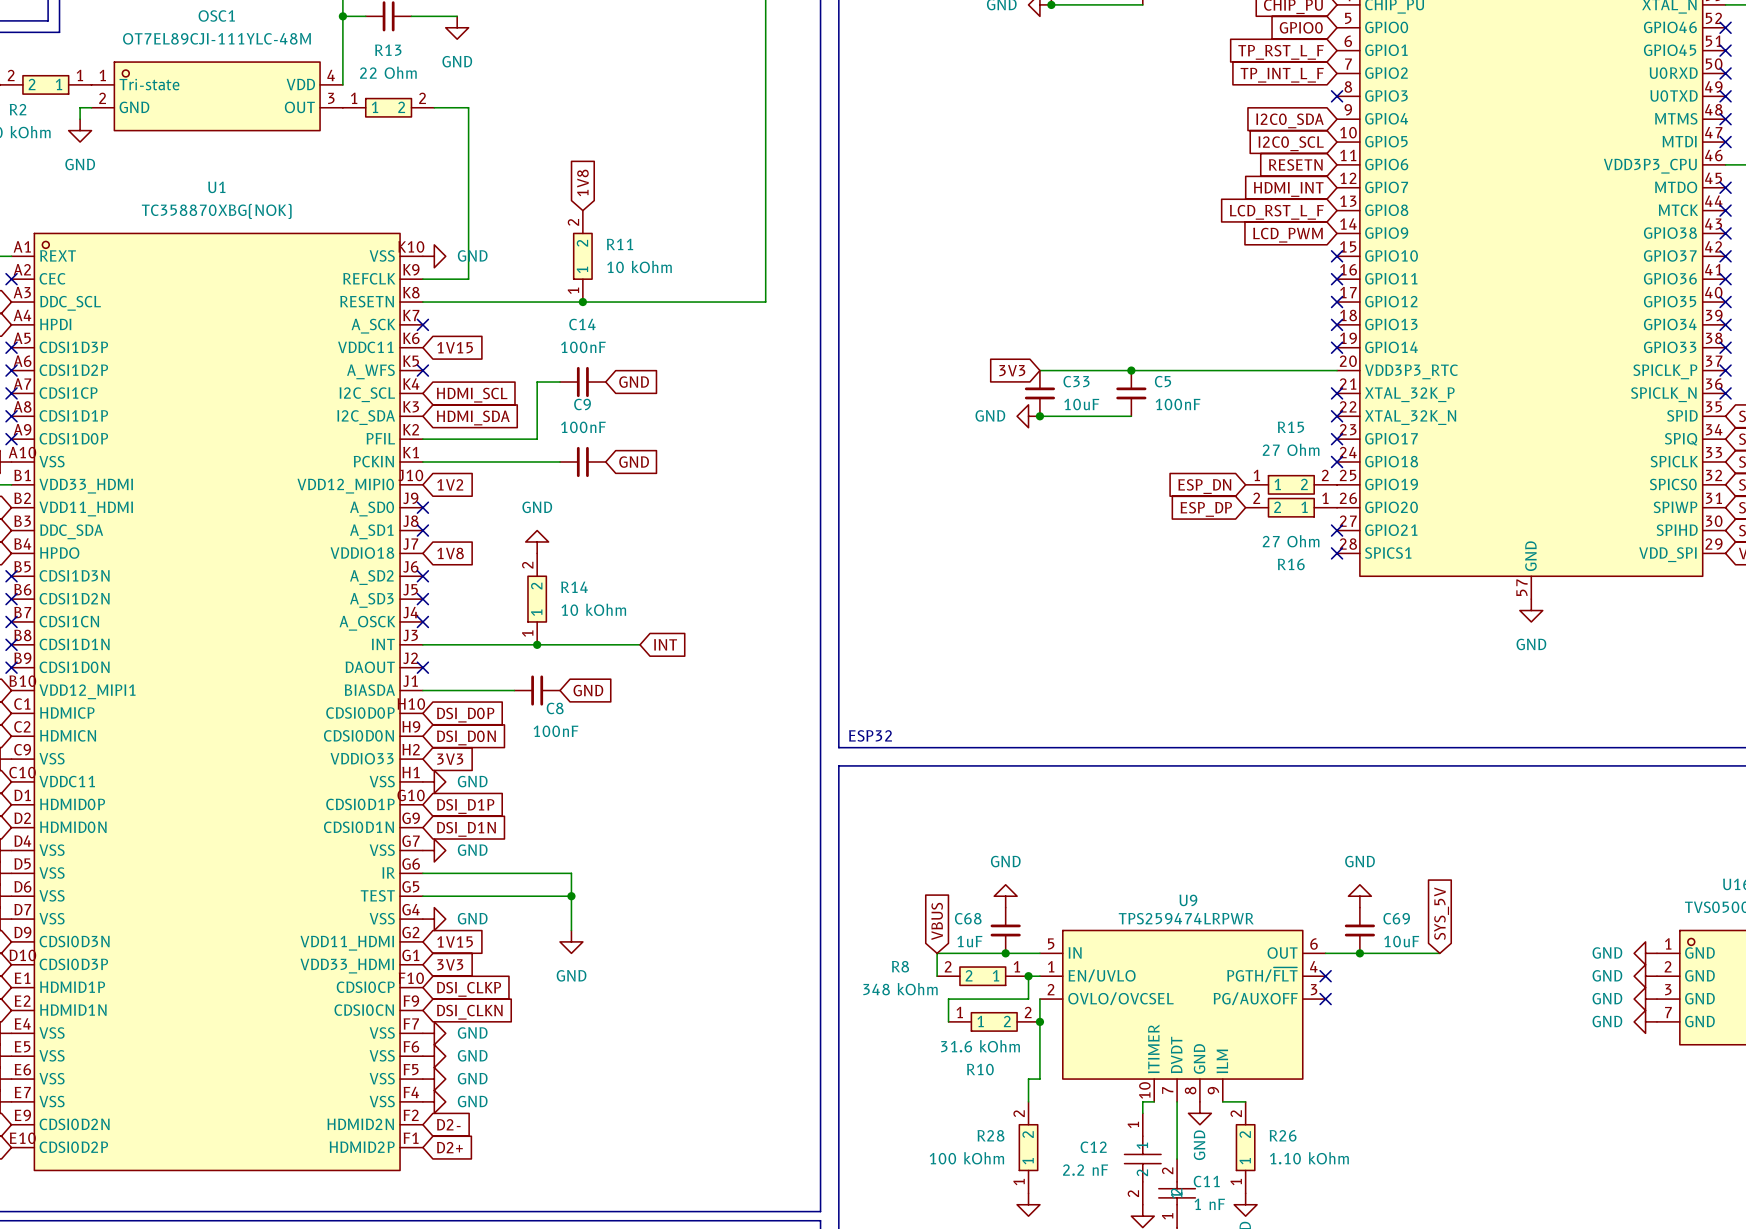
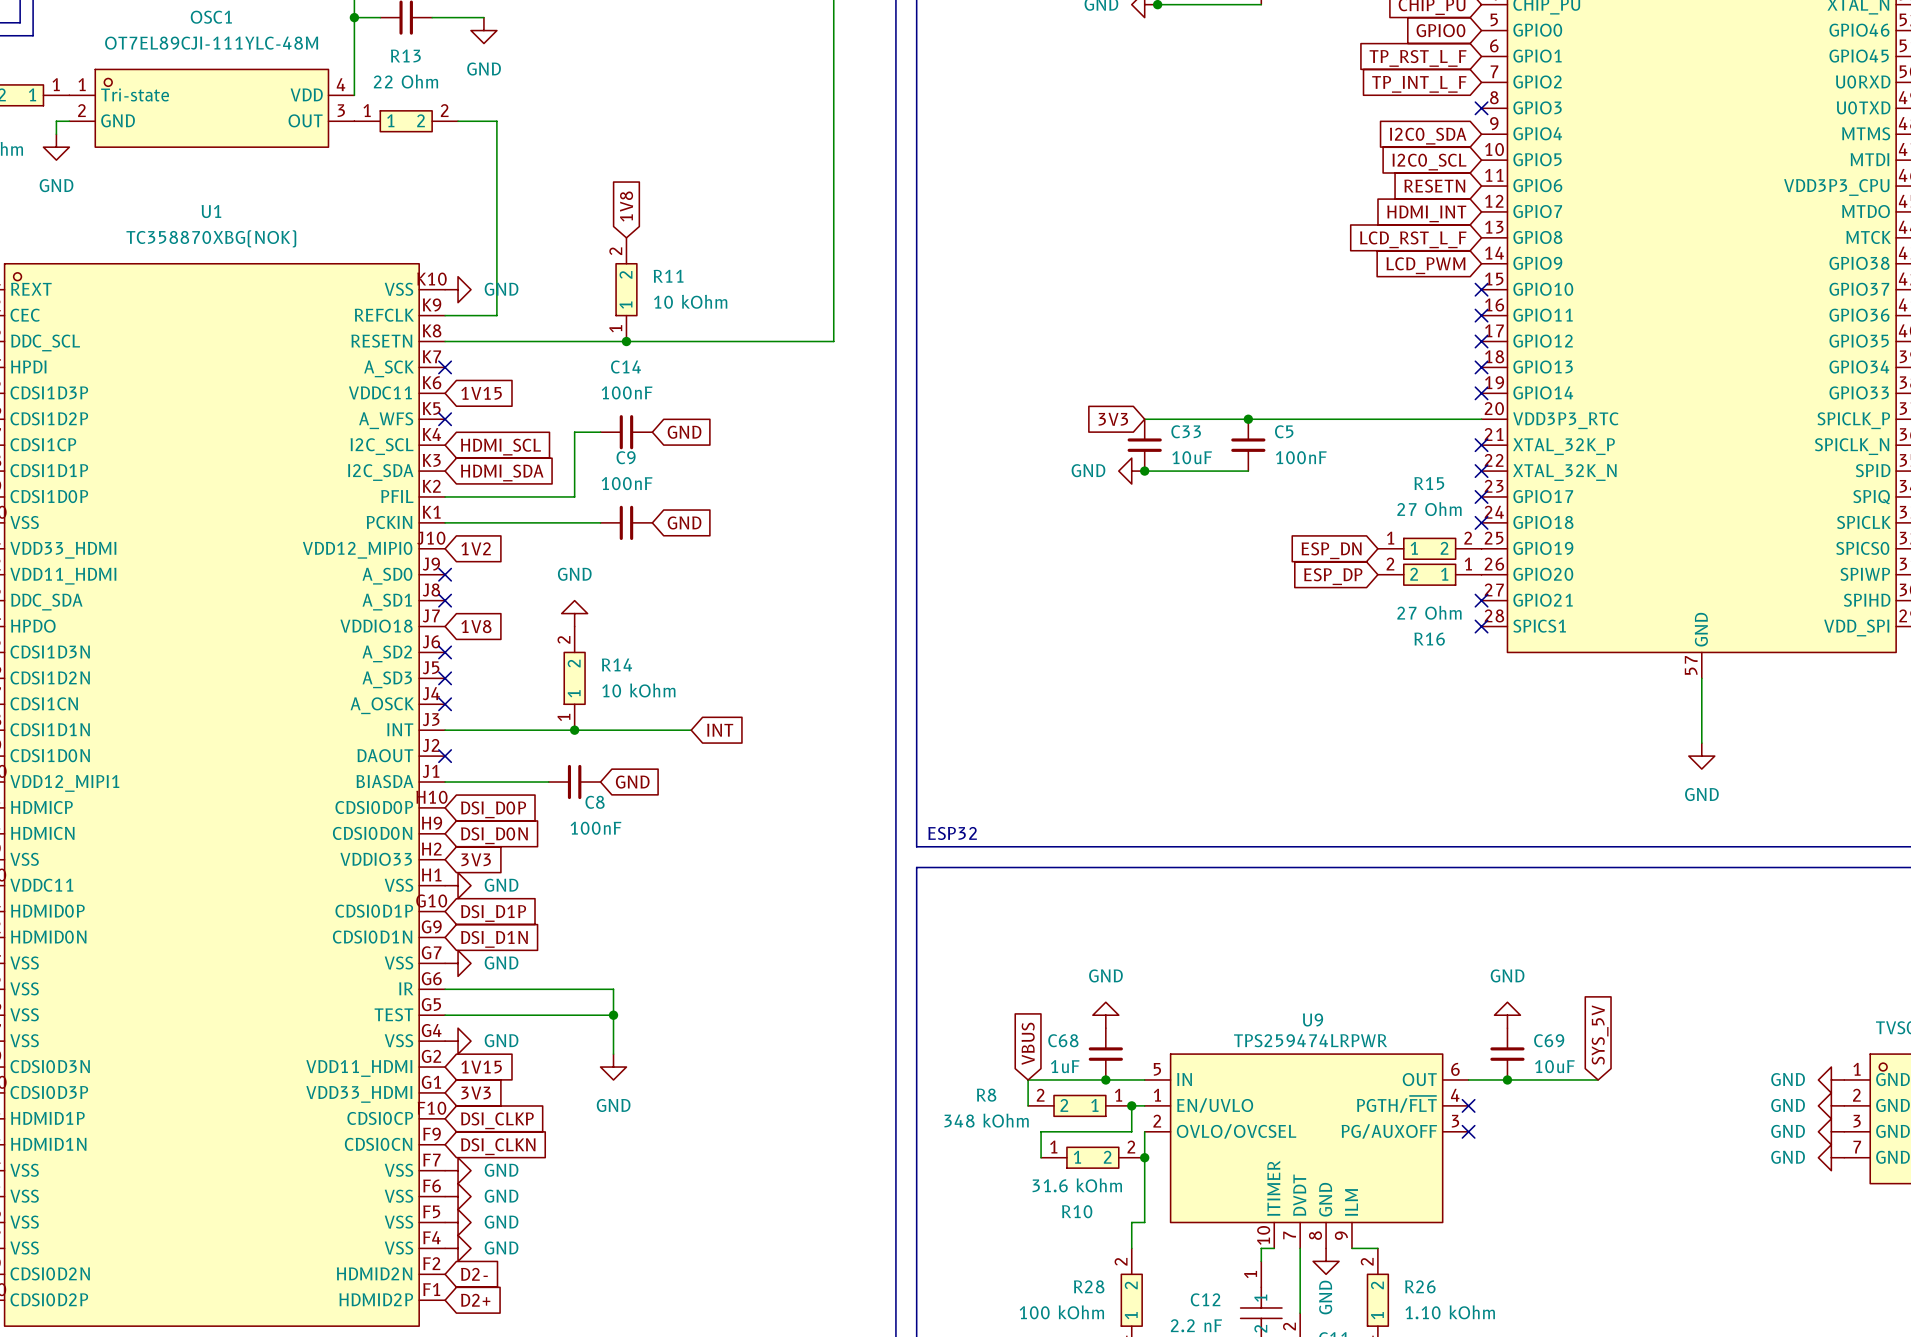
wire: none -> (1701, 678) (1701, 743)
power symbol position: GND (1531, 610) -> GND (1701, 756)

